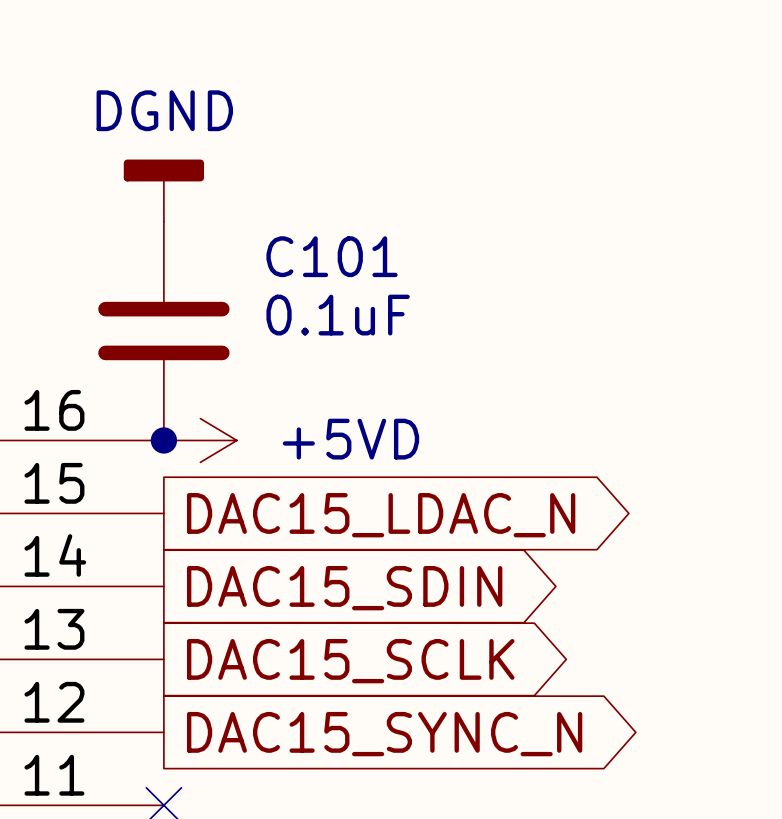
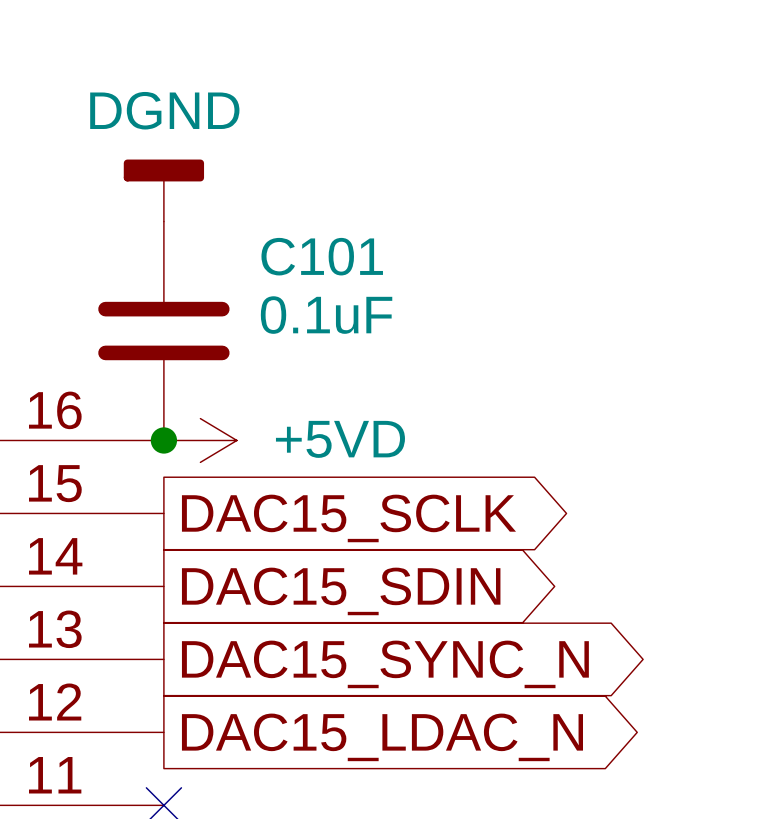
global label: DAC15_LDAC_N (381, 515) -> DAC15_SCLK (348, 518)
global label: DAC15_SCLK (350, 661) -> DAC15_SYNC_N (385, 664)
global label: DAC15_SYNC_N (384, 734) -> DAC15_LDAC_N (382, 737)

